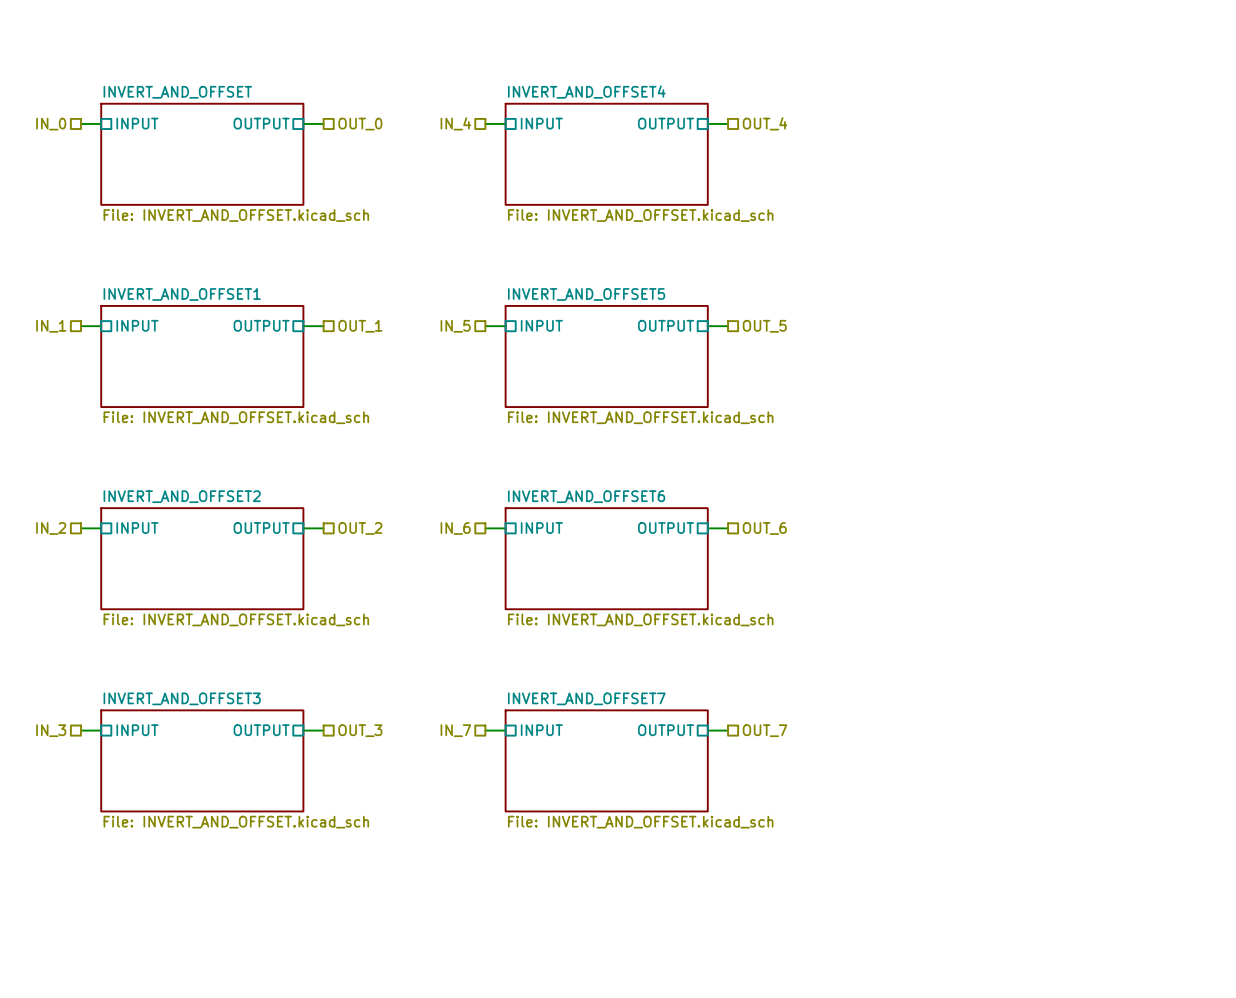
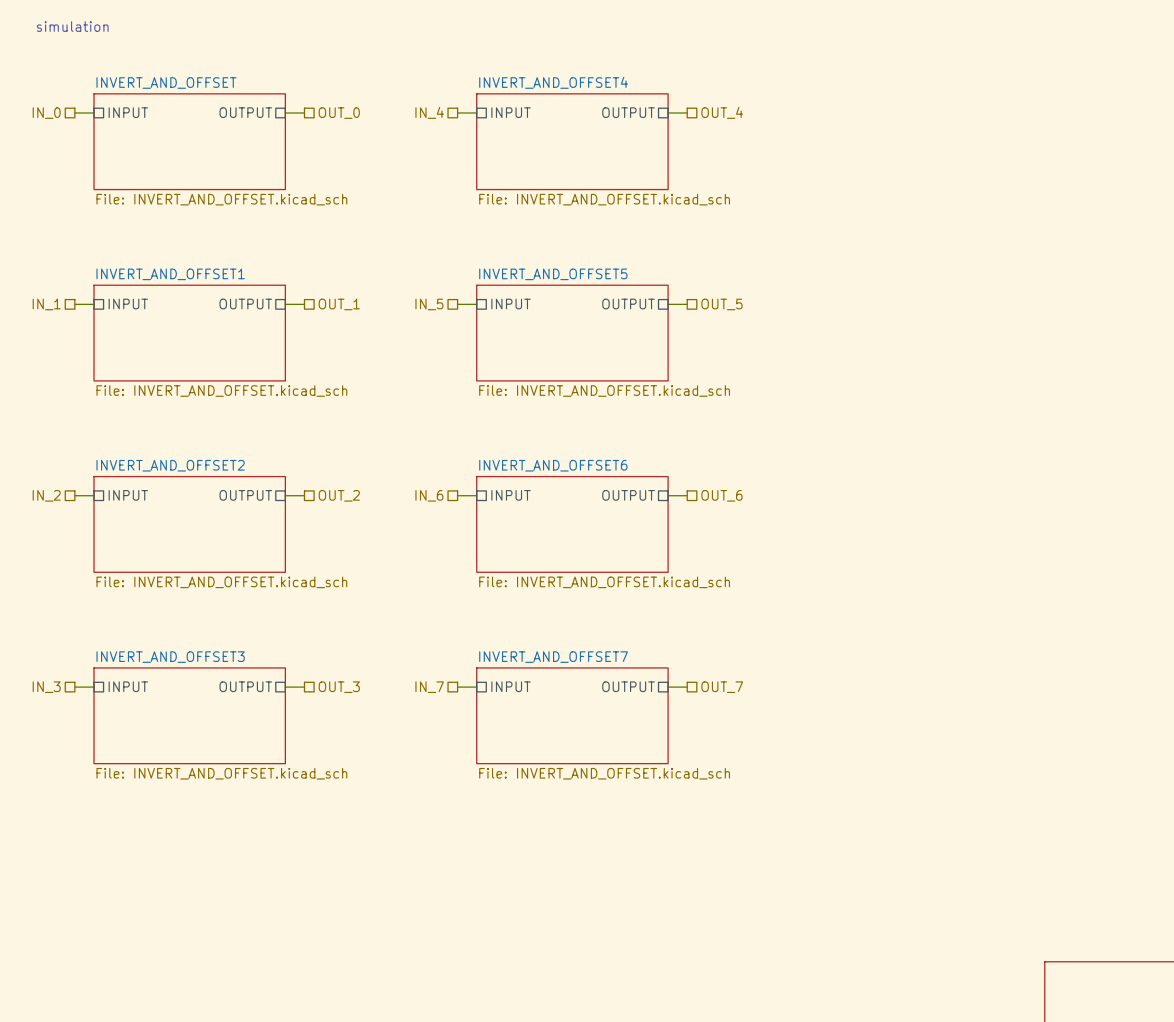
text: none -> simulation (72, 26)

